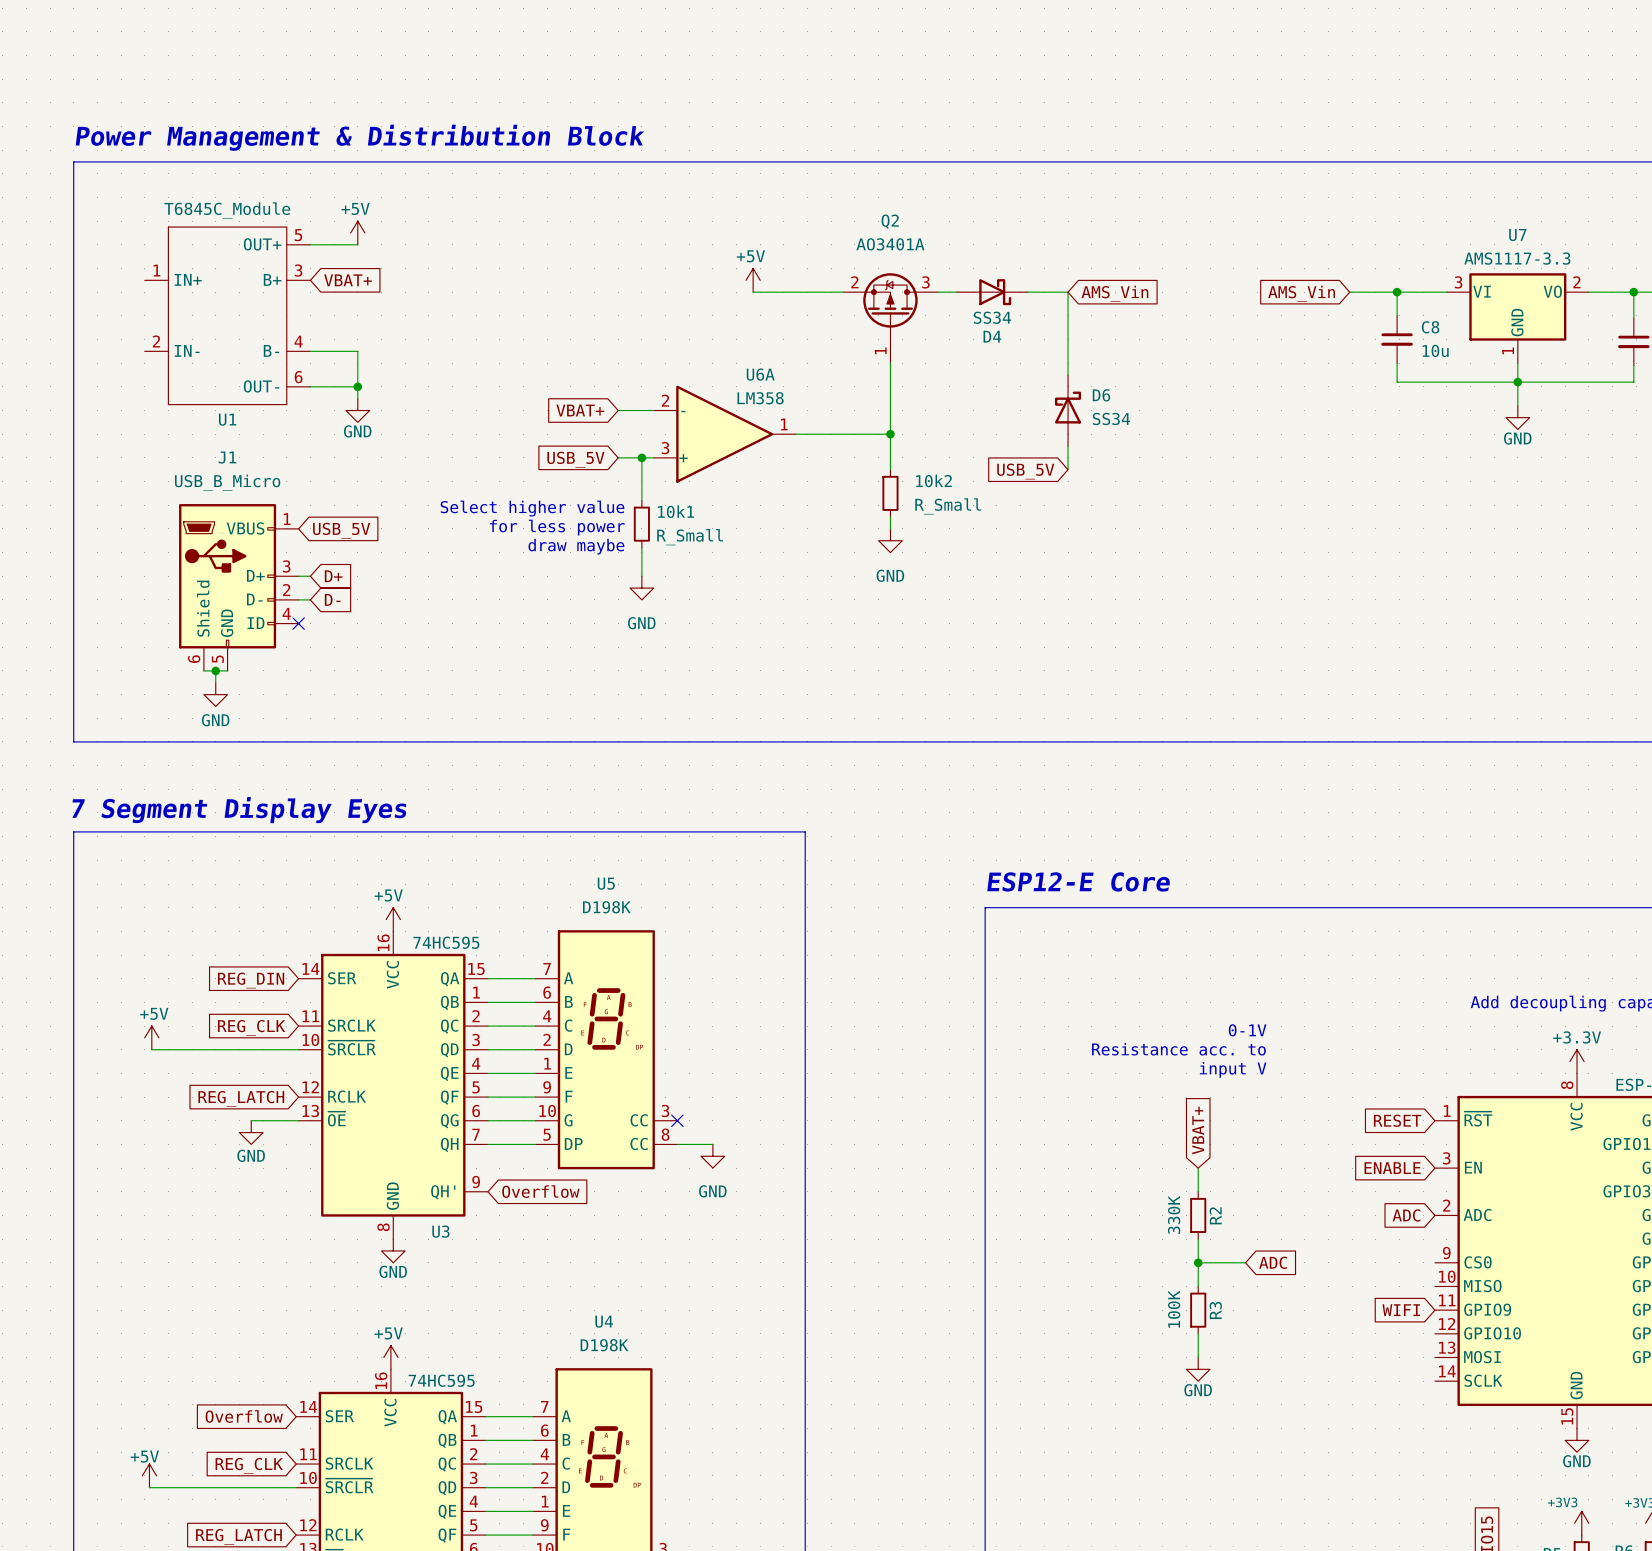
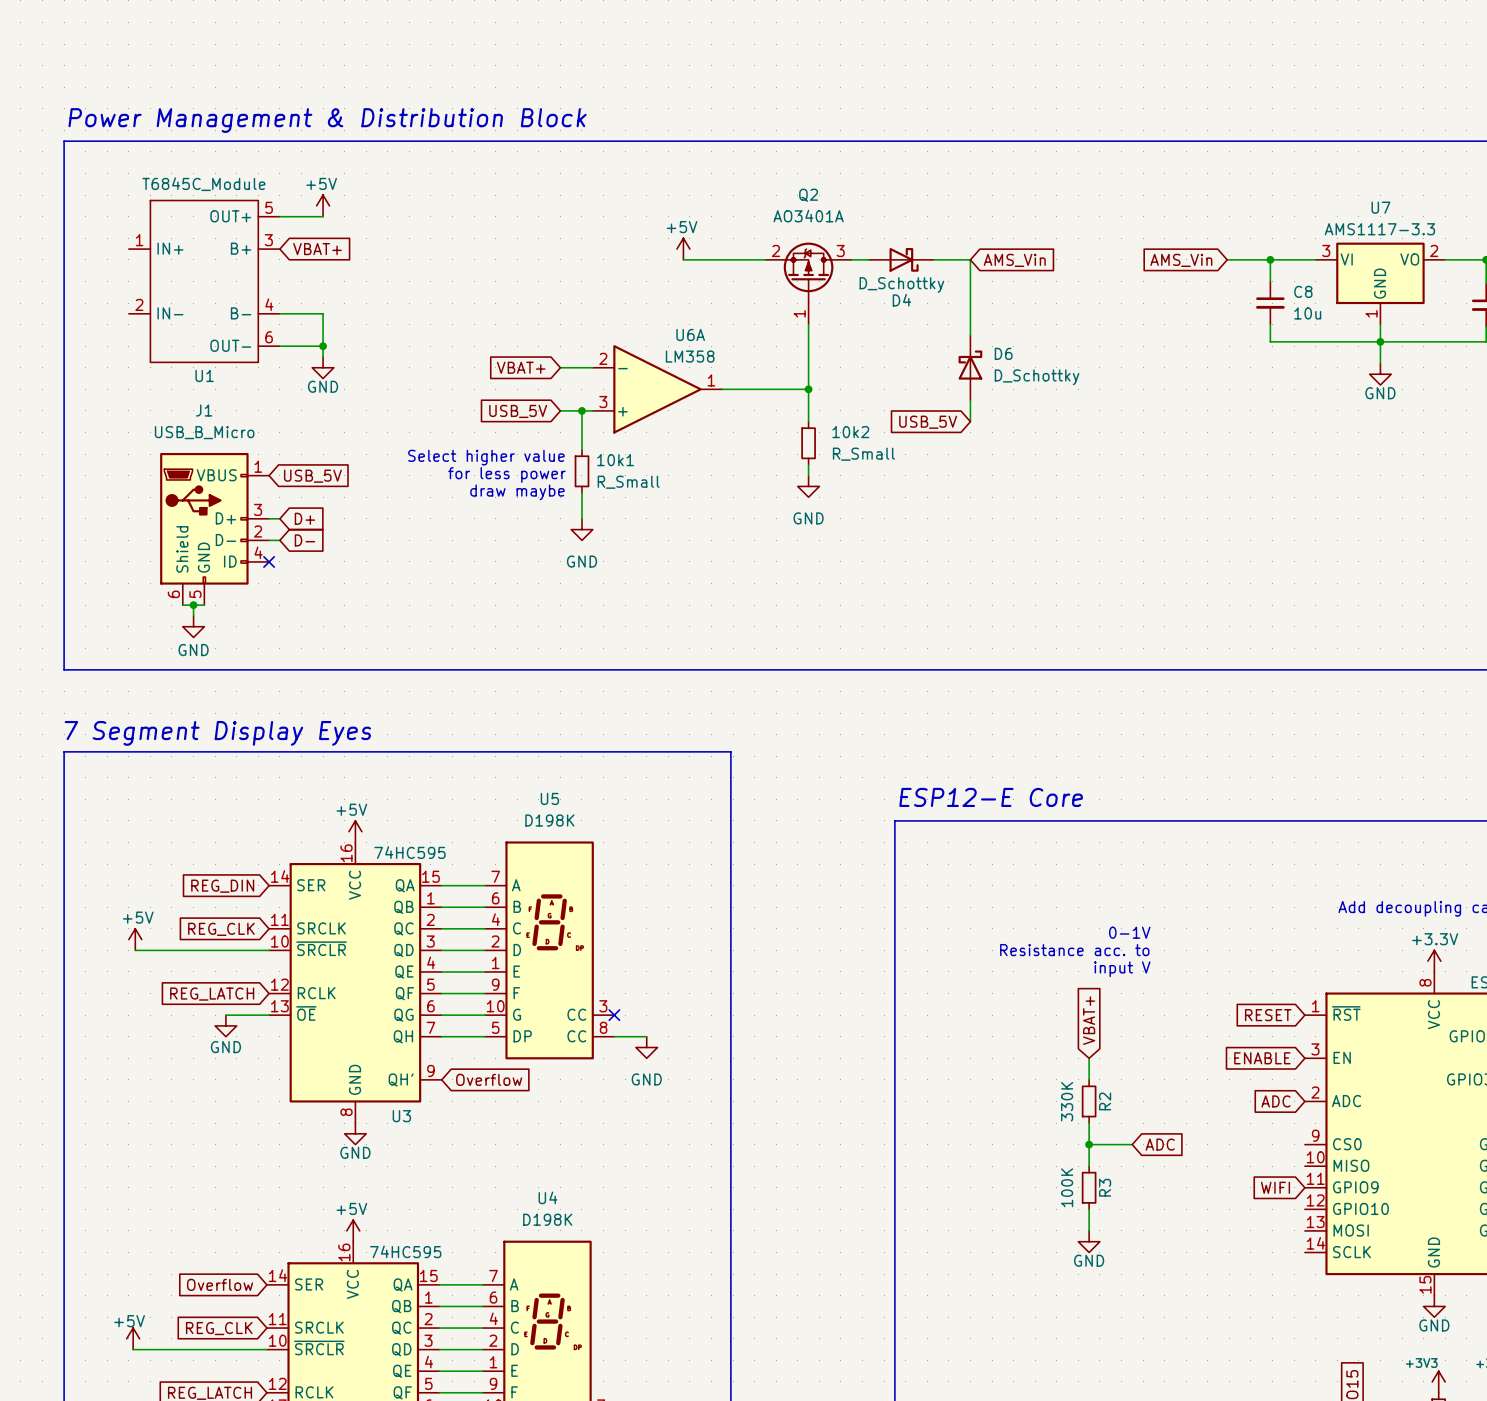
D4 value: SS34 (992, 317) -> D_Schottky (901, 284)
D6 value: SS34 (1111, 418) -> D_Schottky (1037, 377)

